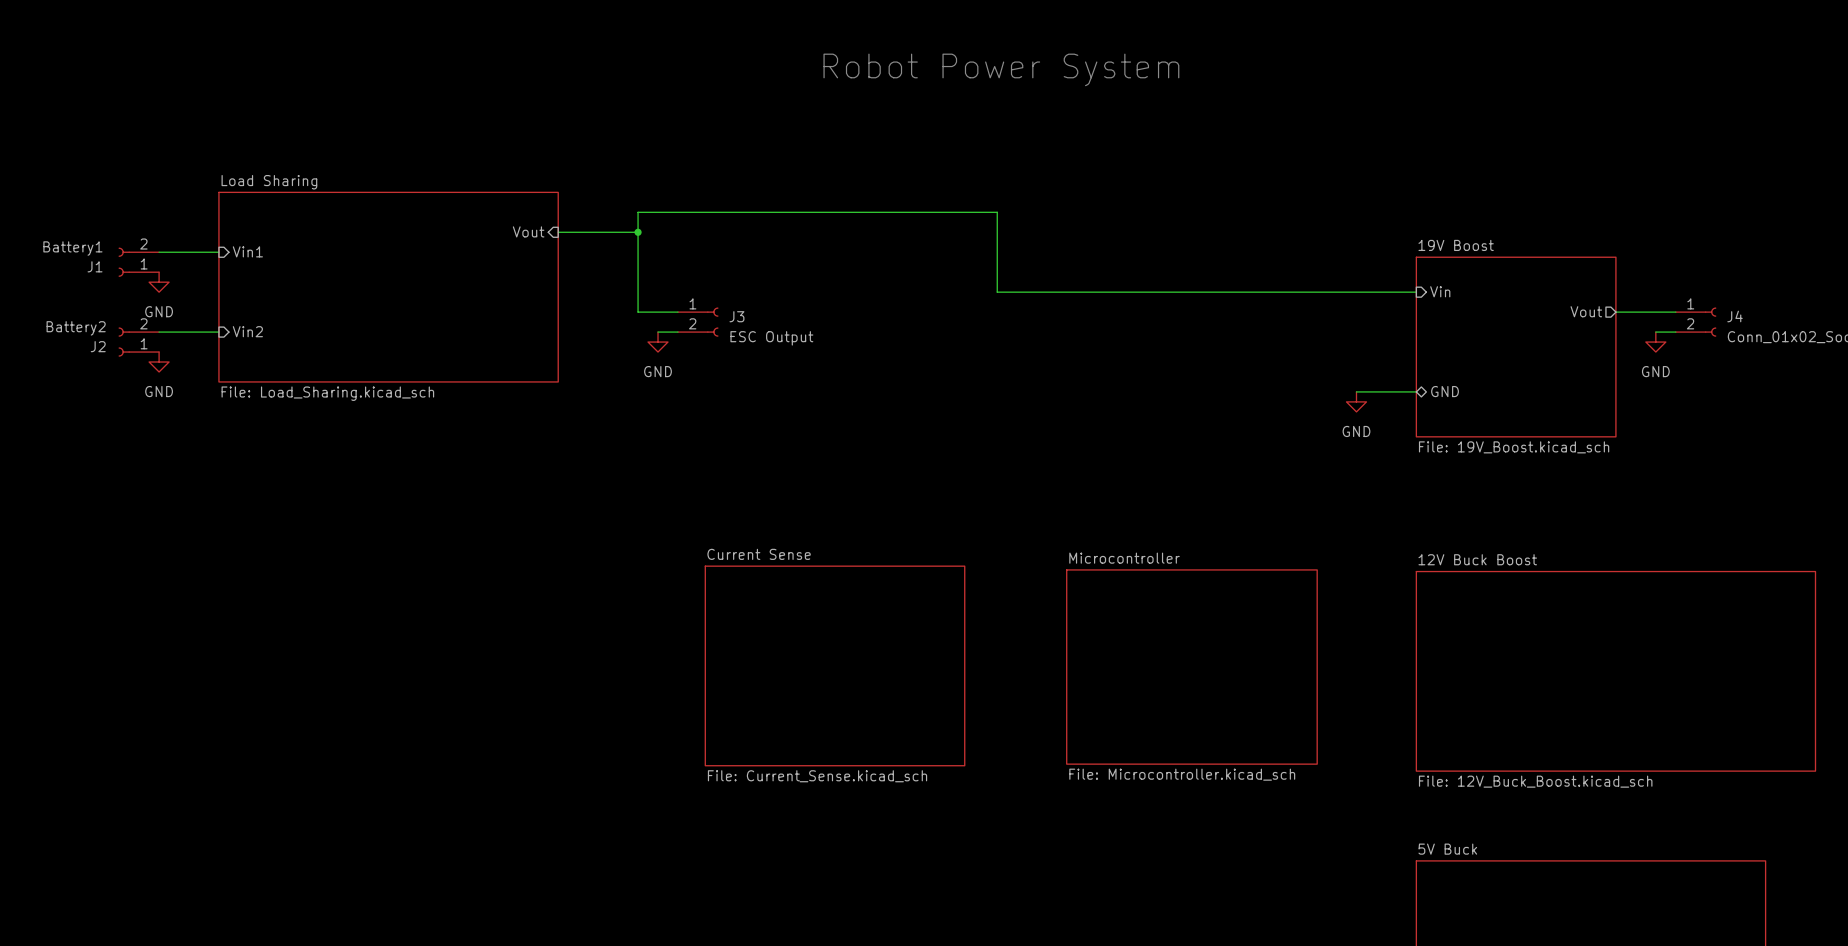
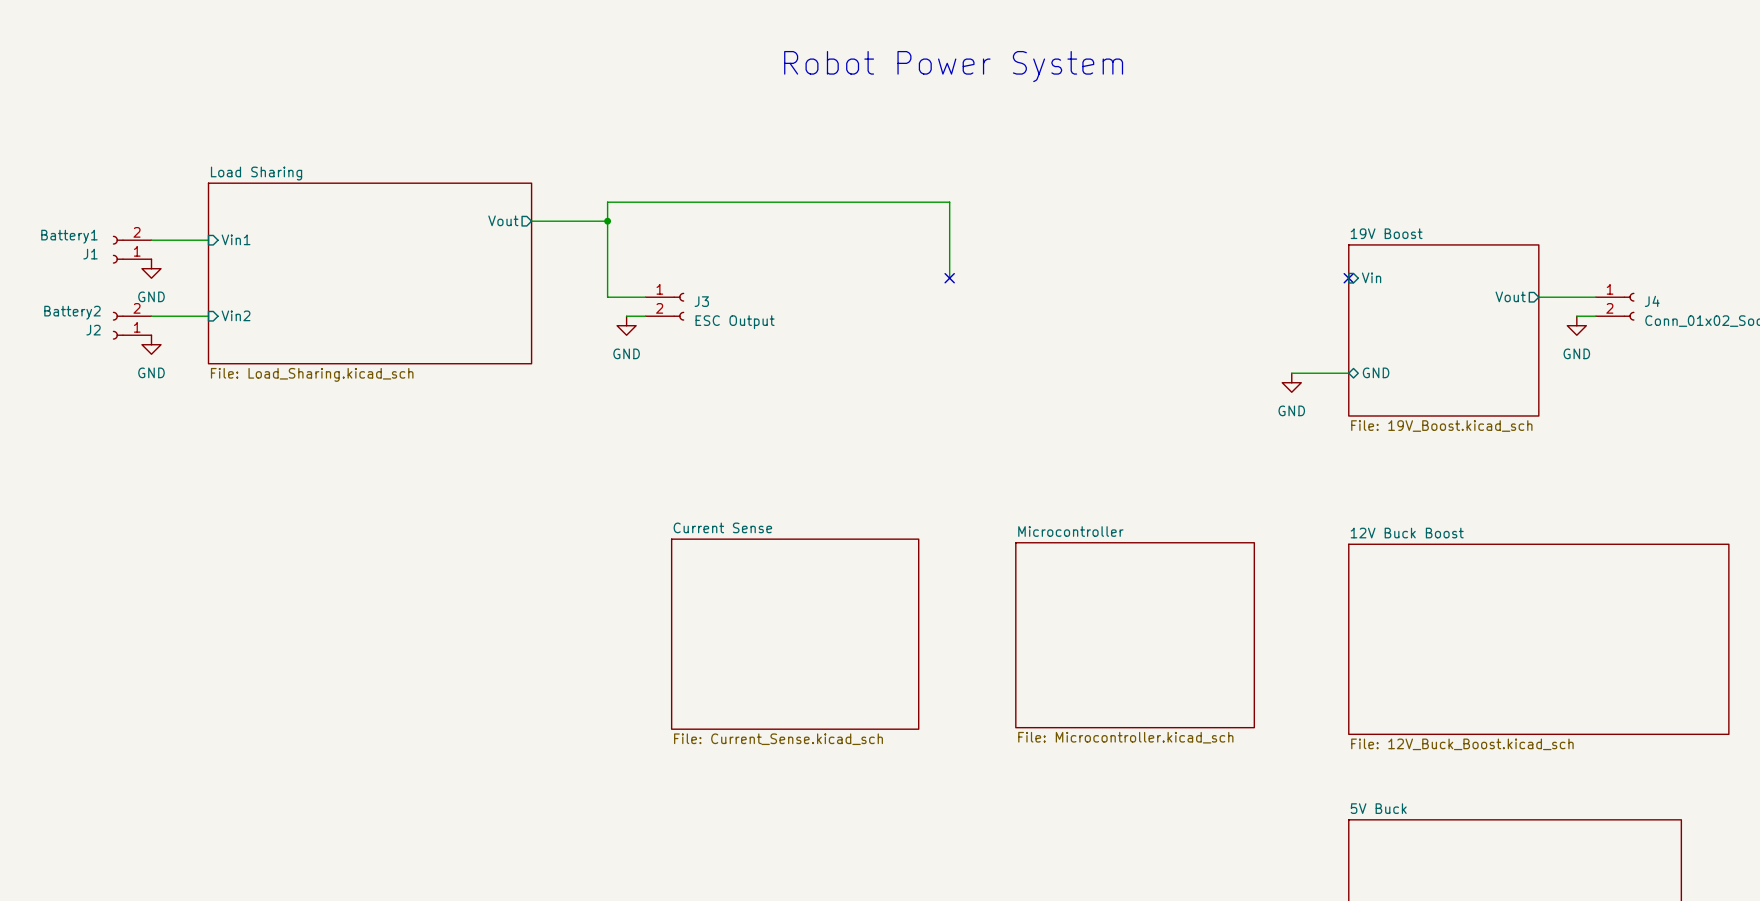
sheet pin shape: input (528, 231) -> output (503, 220)
wire: (997, 292) (1416, 292) -> none
no-connect mark: none -> (949, 278)
no-connect mark: none -> (1348, 278)

